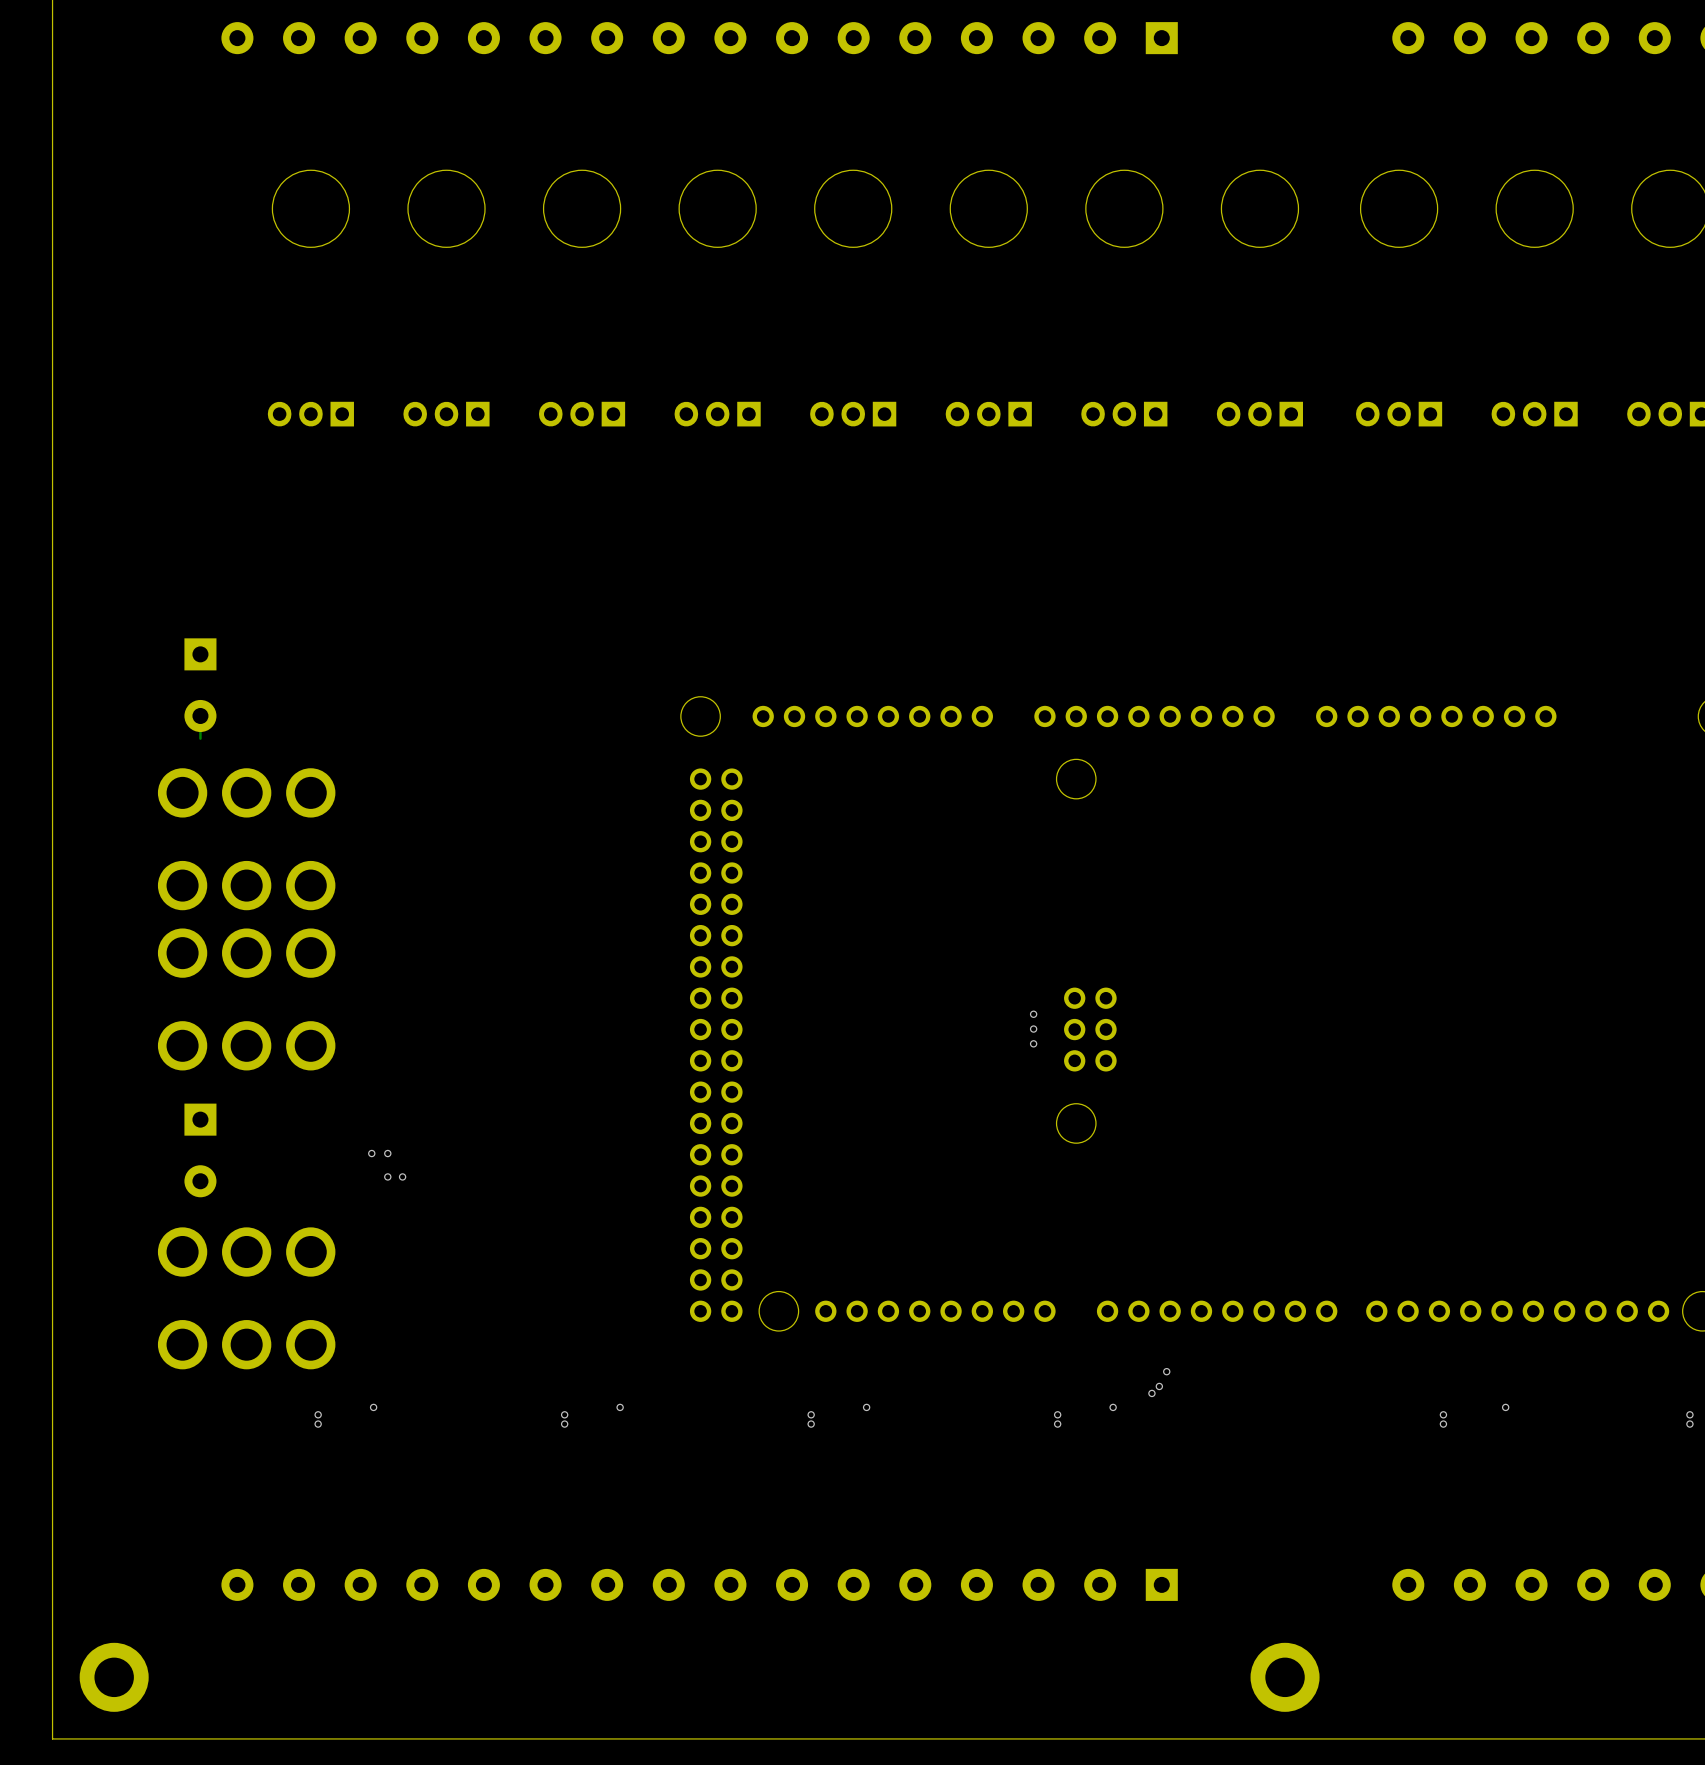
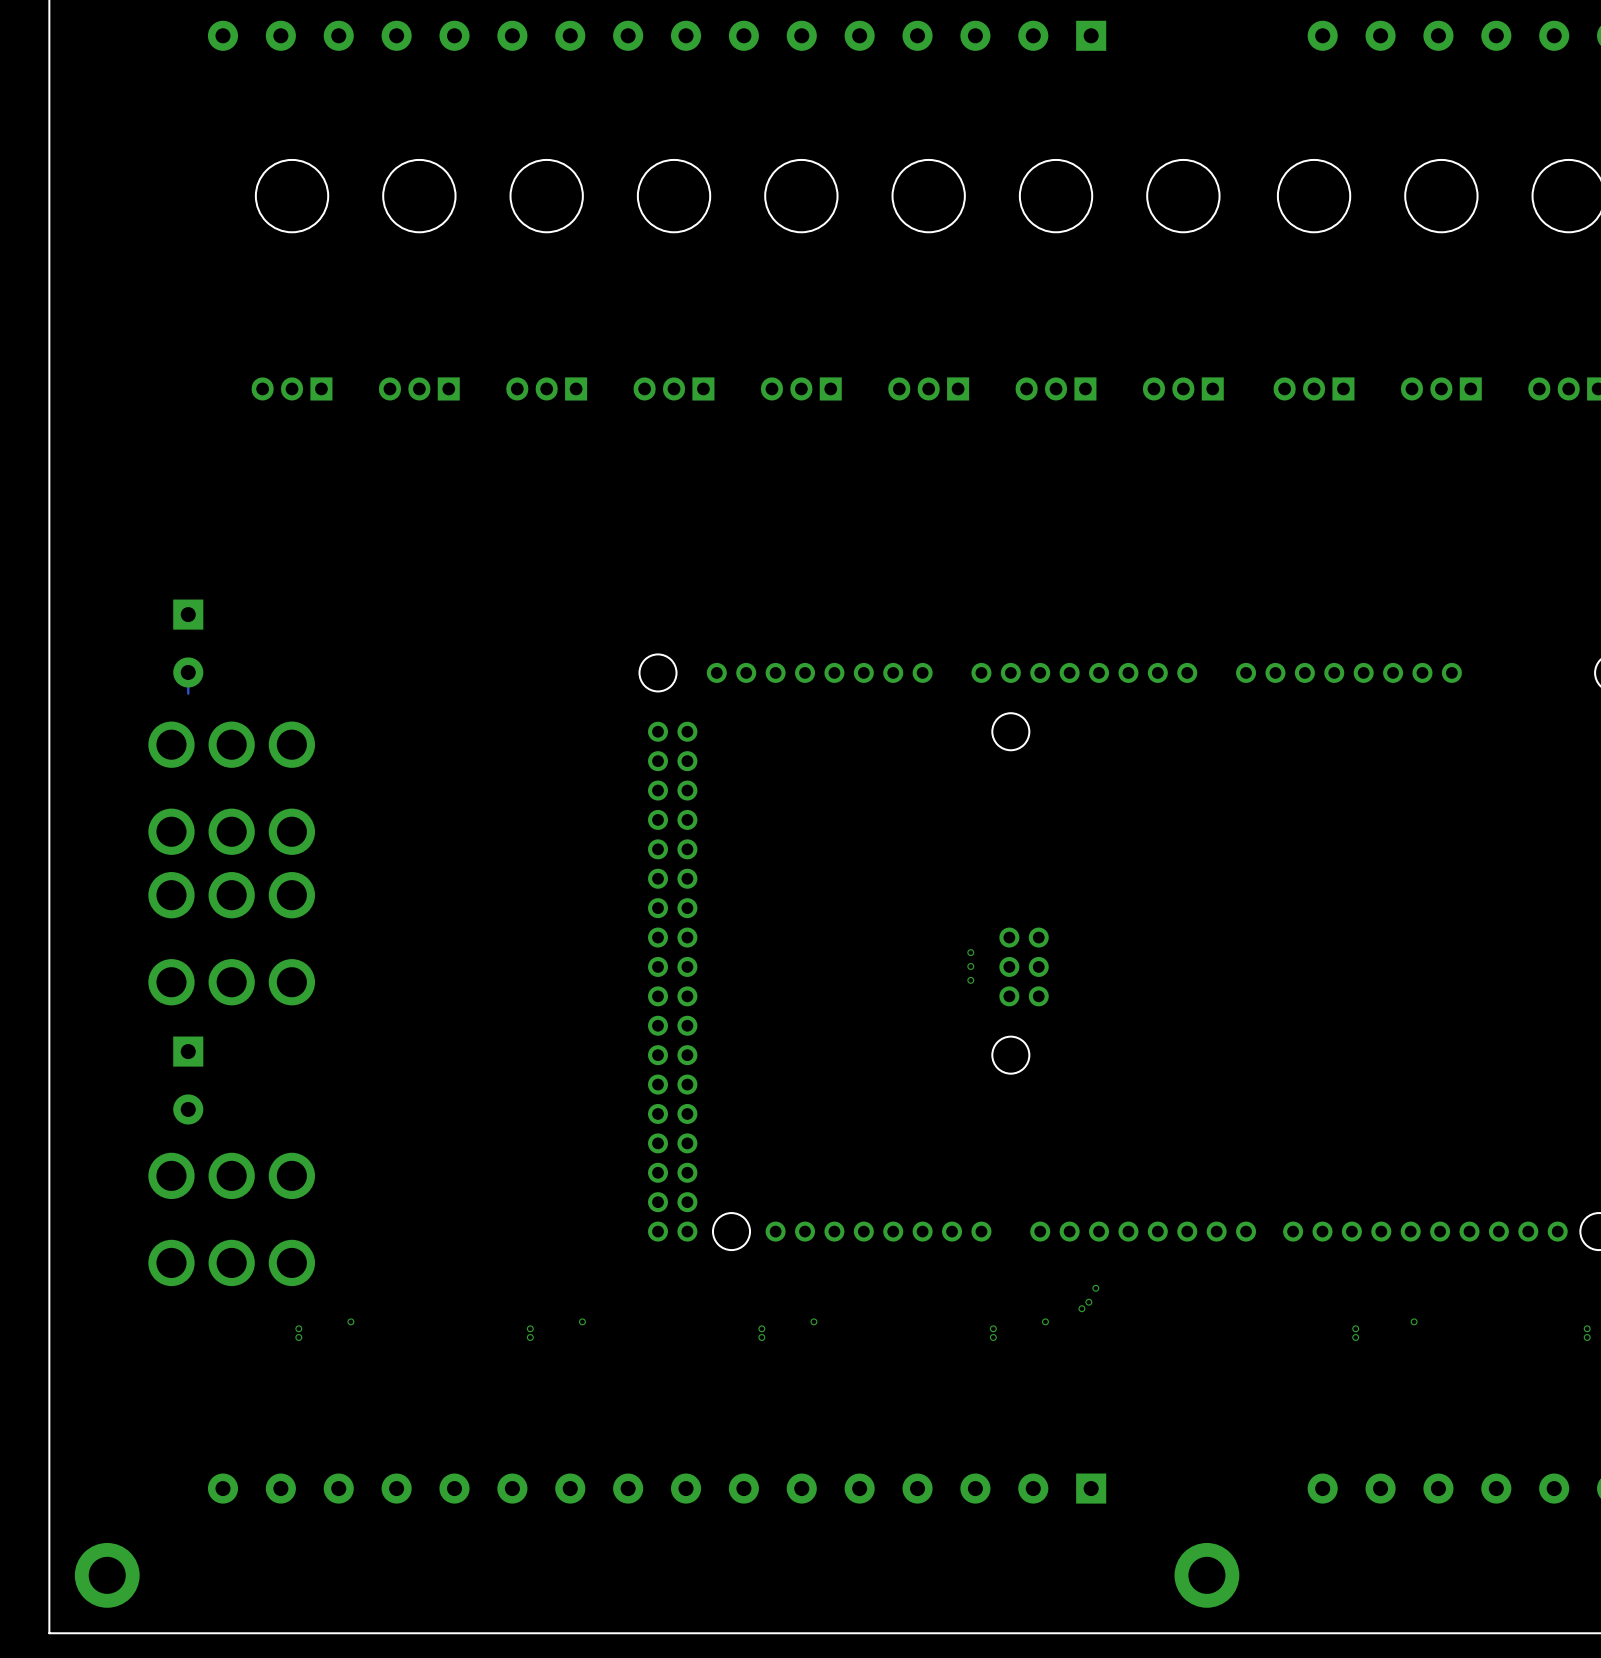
via: (371, 1153) -> none
via: (387, 1153) -> none
via: (387, 1176) -> none
via: (402, 1176) -> none

